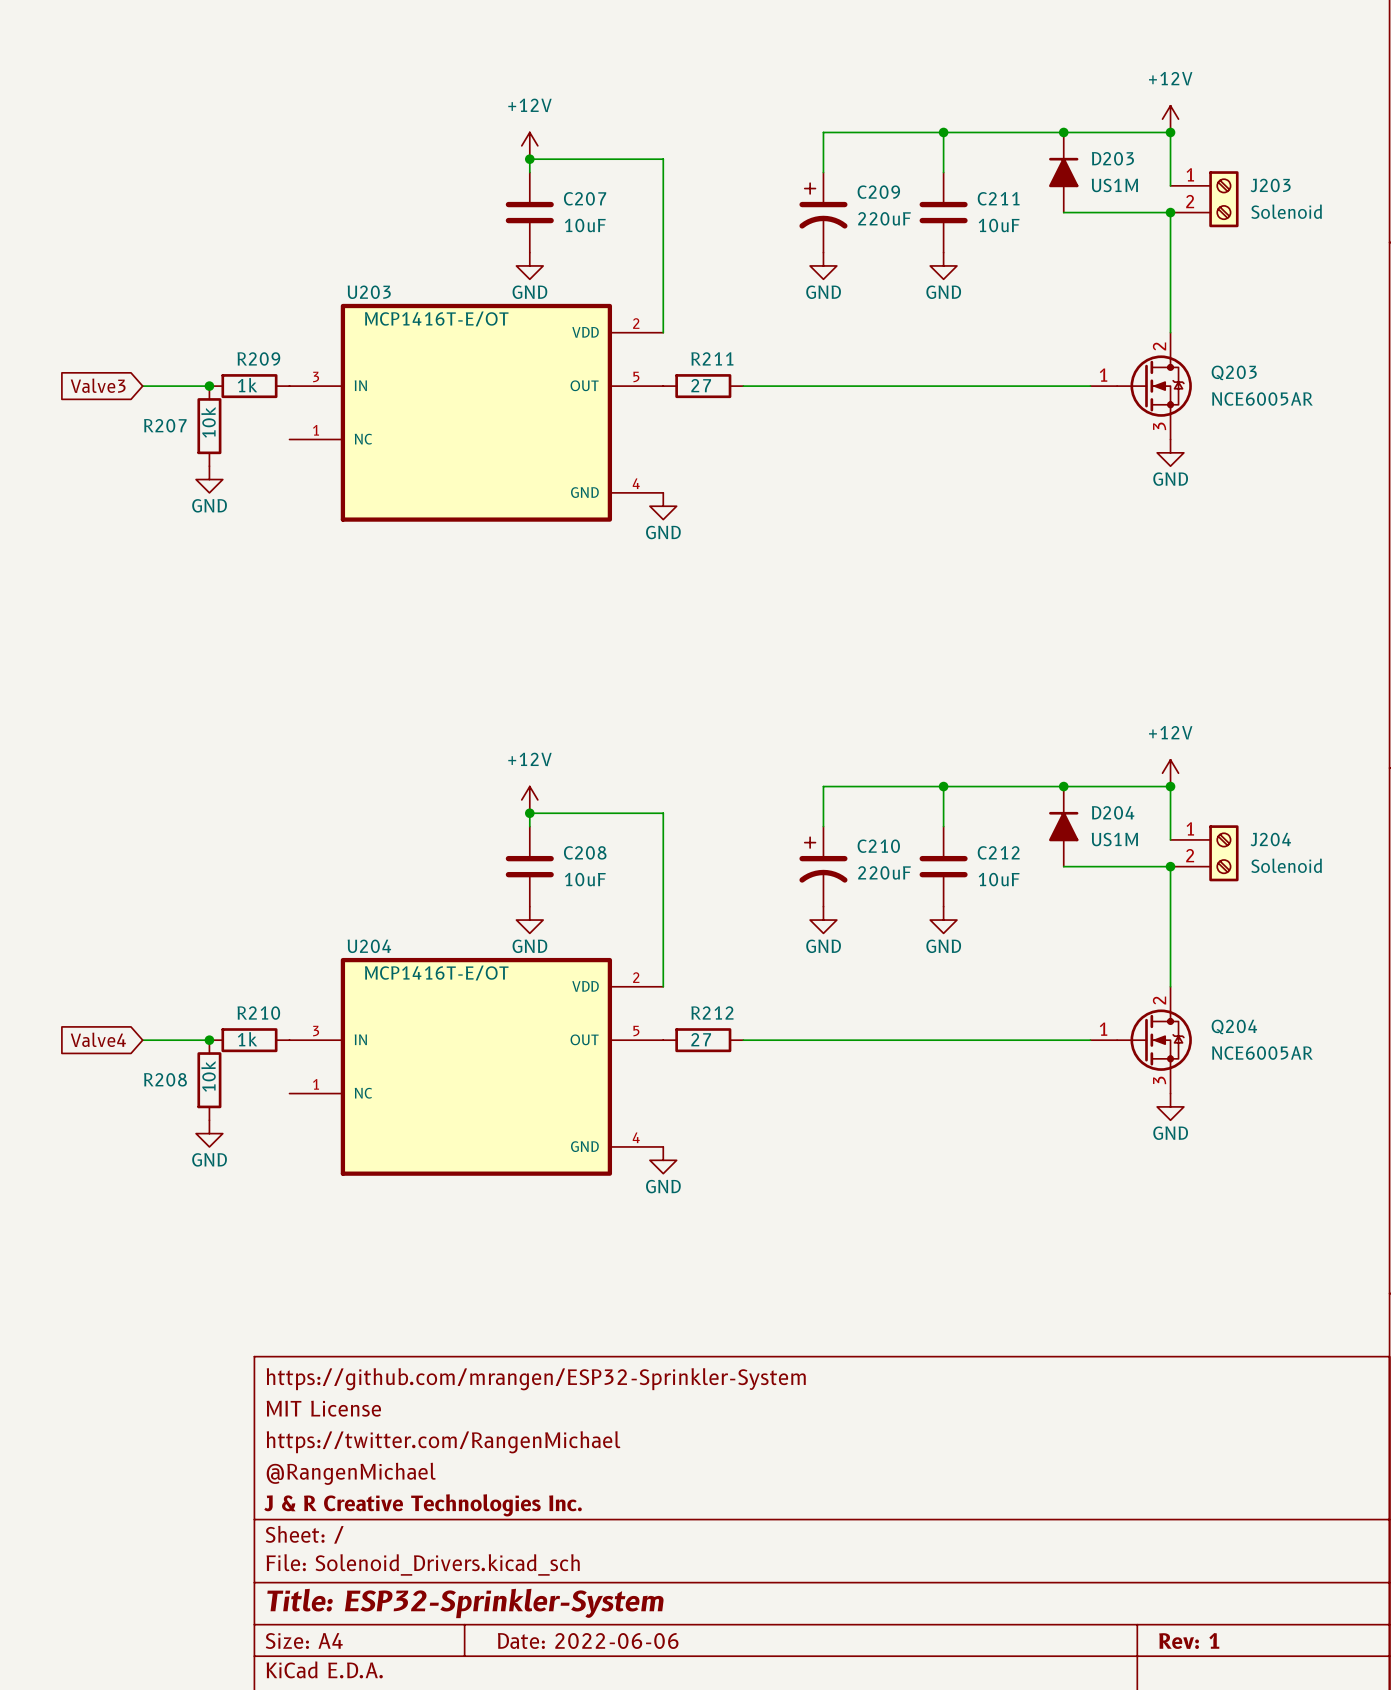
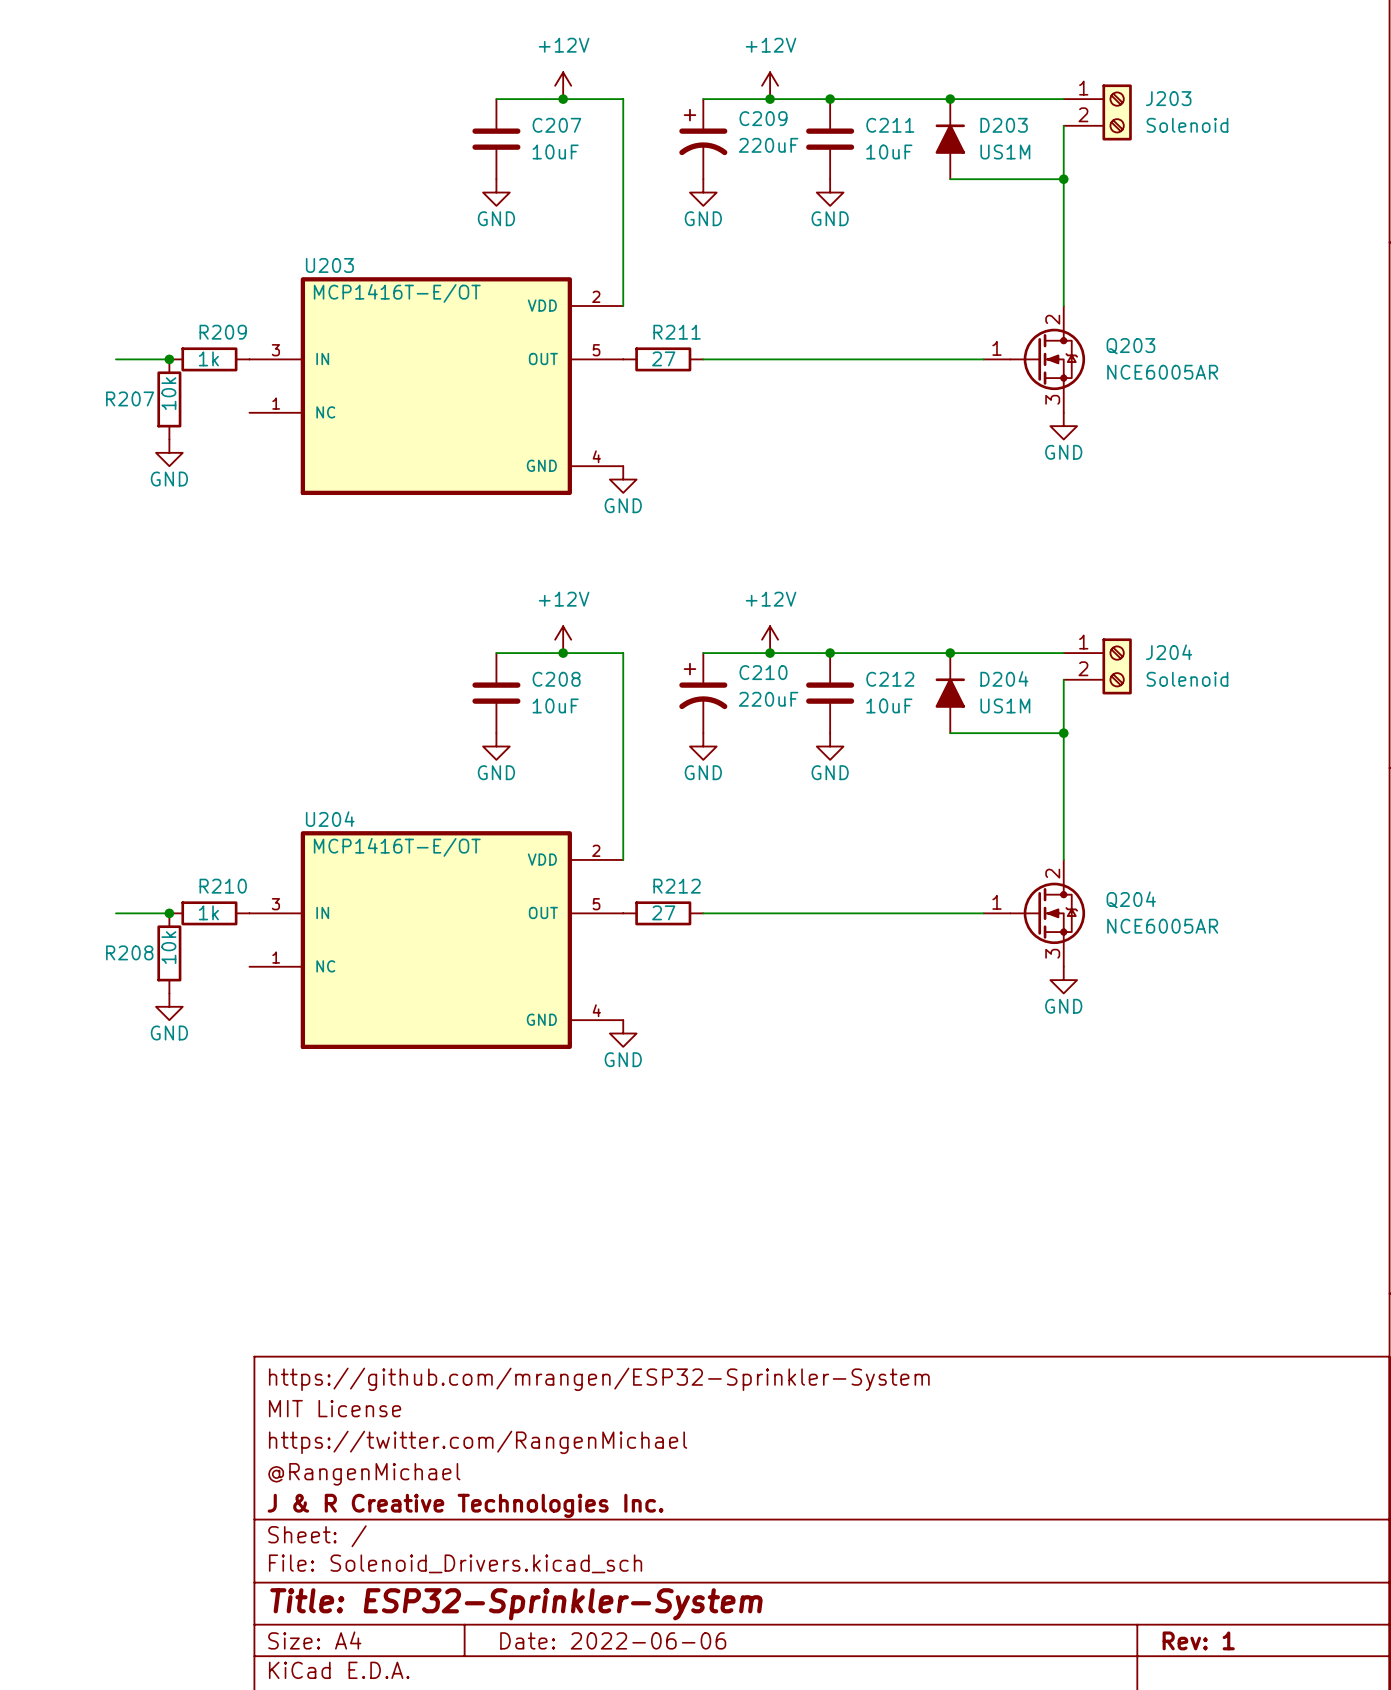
power symbol: none -> +12V (770, 85)
wire: none -> (496, 99) (623, 99) (623, 306)
junction: none -> (563, 99)
wire: none -> (703, 99) (1063, 99)
junction: none -> (770, 99)
junction: none -> (830, 99)
power symbol: +12V (1170, 119) -> none
wire: none -> (1063, 125) (1063, 306)
wire: (943, 132) (943, 172) -> none
junction position: (943, 132) -> (950, 99)
junction position: (1063, 132) -> (1063, 179)
junction: (1170, 132) -> none
power symbol position: +12V (529, 145) -> +12V (563, 85)
junction: (529, 159) -> none
wire: (529, 172) (529, 159) (663, 159) (663, 332) -> none
wire: (823, 172) (823, 132) (1170, 132) (1170, 185) -> none
D203 position: (1063, 172) -> (950, 139)
wire: none -> (950, 179) (1063, 179)
power symbol: none -> GND (703, 192)
power symbol: none -> GND (830, 192)
J203 position: (1204, 199) -> (1097, 112)
C207 position: (529, 212) -> (496, 139)
C209 position: (823, 212) -> (703, 139)
C211 position: (943, 212) -> (830, 139)
wire: (1063, 212) (1170, 212) (1170, 332) -> none
junction: (1170, 212) -> none
power symbol position: GND (529, 265) -> GND (496, 192)
power symbol: GND (823, 265) -> none
power symbol: GND (943, 265) -> none
wire: none -> (115, 359) (169, 359)
wire: none -> (703, 359) (983, 359)
global label: Valve3 (98, 385) -> none
wire: (142, 386) (209, 386) -> none
junction position: (209, 386) -> (169, 359)
R209 position: (249, 386) -> (209, 359)
R211 position: (703, 386) -> (663, 359)
wire: (743, 386) (1090, 386) -> none
Q203 position: (1141, 386) -> (1034, 359)
U203 position: (476, 412) -> (436, 386)
R207 position: (209, 426) -> (169, 399)
power symbol: none -> GND (1063, 426)
power symbol: GND (1170, 452) -> none
power symbol position: GND (209, 479) -> GND (169, 452)
power symbol position: GND (663, 506) -> GND (623, 479)
power symbol: none -> +12V (563, 639)
power symbol: none -> +12V (770, 639)
wire: none -> (496, 653) (623, 653) (623, 859)
junction: none -> (563, 653)
wire: none -> (703, 653) (1063, 653)
junction: none -> (770, 653)
junction: none -> (830, 653)
junction: none -> (950, 653)
wire: none -> (1063, 679) (1063, 859)
wire: none -> (950, 733) (1063, 733)
power symbol: none -> GND (496, 746)
power symbol: none -> GND (703, 746)
power symbol: none -> GND (830, 746)
power symbol: +12V (1170, 773) -> none
wire: (943, 786) (943, 826) -> none
junction: (943, 786) -> none
junction position: (1063, 786) -> (1063, 733)
junction: (1170, 786) -> none
power symbol: +12V (529, 799) -> none
junction: (529, 813) -> none
wire: (529, 826) (529, 813) (663, 813) (663, 986) -> none
wire: (823, 826) (823, 786) (1170, 786) (1170, 839) -> none
D204 position: (1063, 826) -> (950, 693)
J204 position: (1204, 853) -> (1097, 666)
C208 position: (529, 866) -> (496, 693)
C210 position: (823, 866) -> (703, 693)
C212 position: (943, 866) -> (830, 693)
wire: (1063, 866) (1170, 866) (1170, 986) -> none
junction: (1170, 866) -> none
wire: none -> (115, 913) (169, 913)
junction: none -> (169, 913)
wire: none -> (703, 913) (983, 913)
power symbol: GND (529, 920) -> none
power symbol: GND (823, 920) -> none
power symbol: GND (943, 920) -> none
power symbol: none -> GND (1063, 980)
power symbol: none -> GND (623, 1033)
global label: Valve4 (98, 1039) -> none
wire: (142, 1040) (209, 1040) -> none
junction: (209, 1040) -> none
R210 position: (249, 1040) -> (209, 913)
R212 position: (703, 1040) -> (663, 913)
wire: (743, 1040) (1090, 1040) -> none
Q204 position: (1141, 1040) -> (1034, 913)
U204 position: (476, 1066) -> (436, 940)
R208 position: (209, 1080) -> (169, 953)
power symbol: GND (1170, 1106) -> none
power symbol position: GND (209, 1133) -> GND (169, 1006)
power symbol: GND (663, 1160) -> none

